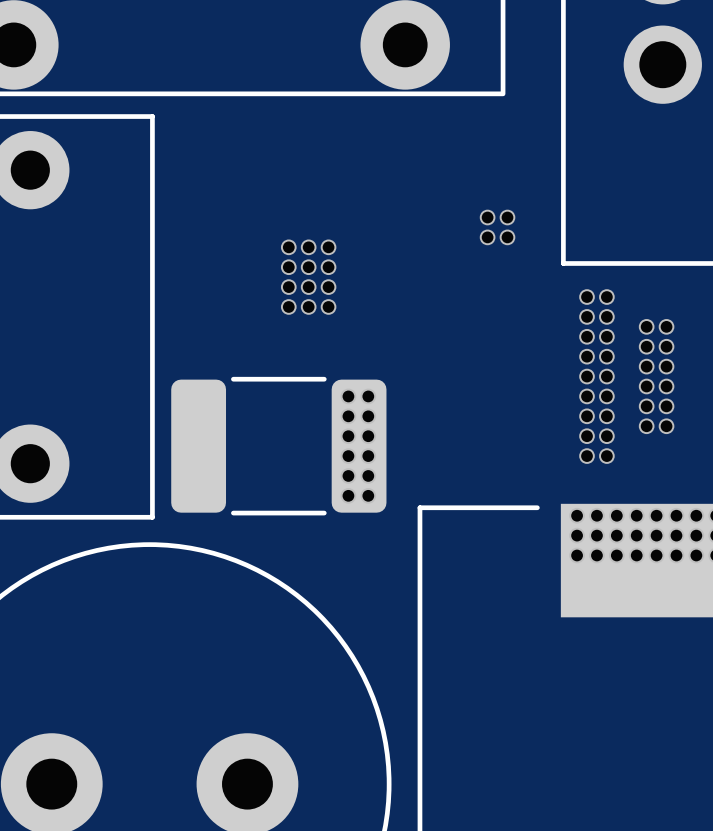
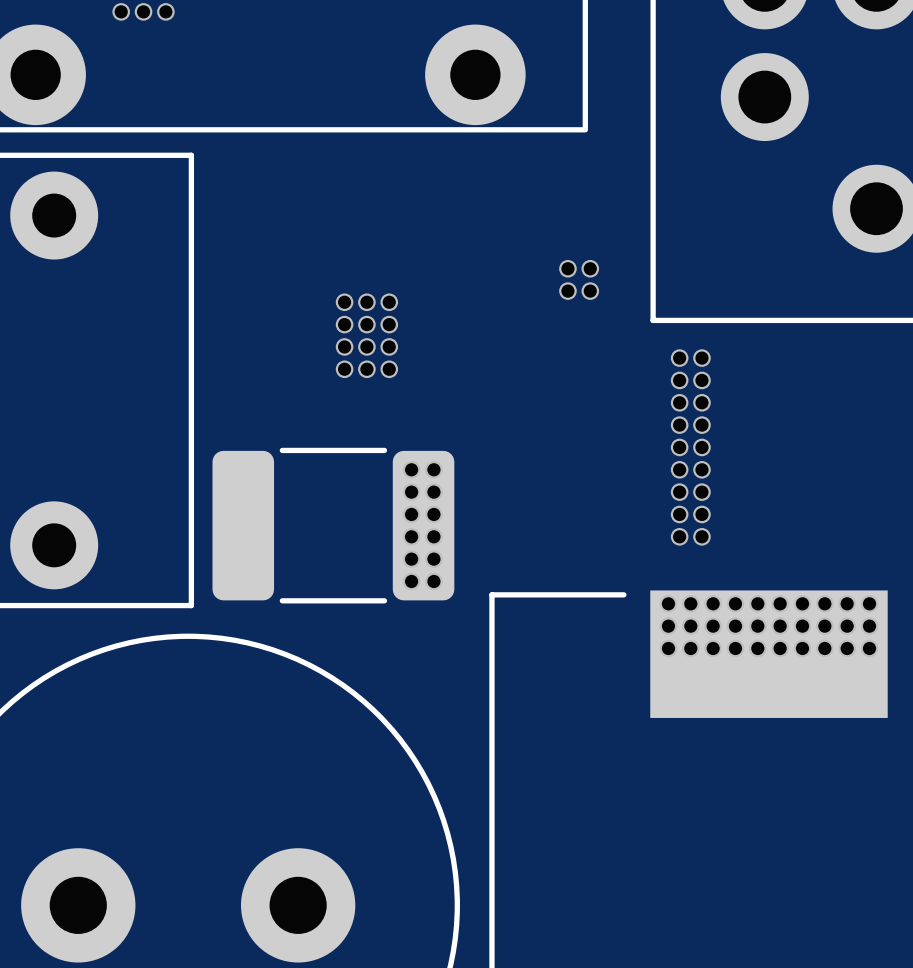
via: (646, 326) -> none
via: (666, 326) -> none
via: (646, 346) -> none
via: (666, 346) -> none
via: (646, 366) -> none
via: (666, 366) -> none
via: (646, 386) -> none
via: (666, 386) -> none
via: (646, 406) -> none
via: (666, 406) -> none
via: (646, 426) -> none
via: (666, 426) -> none

